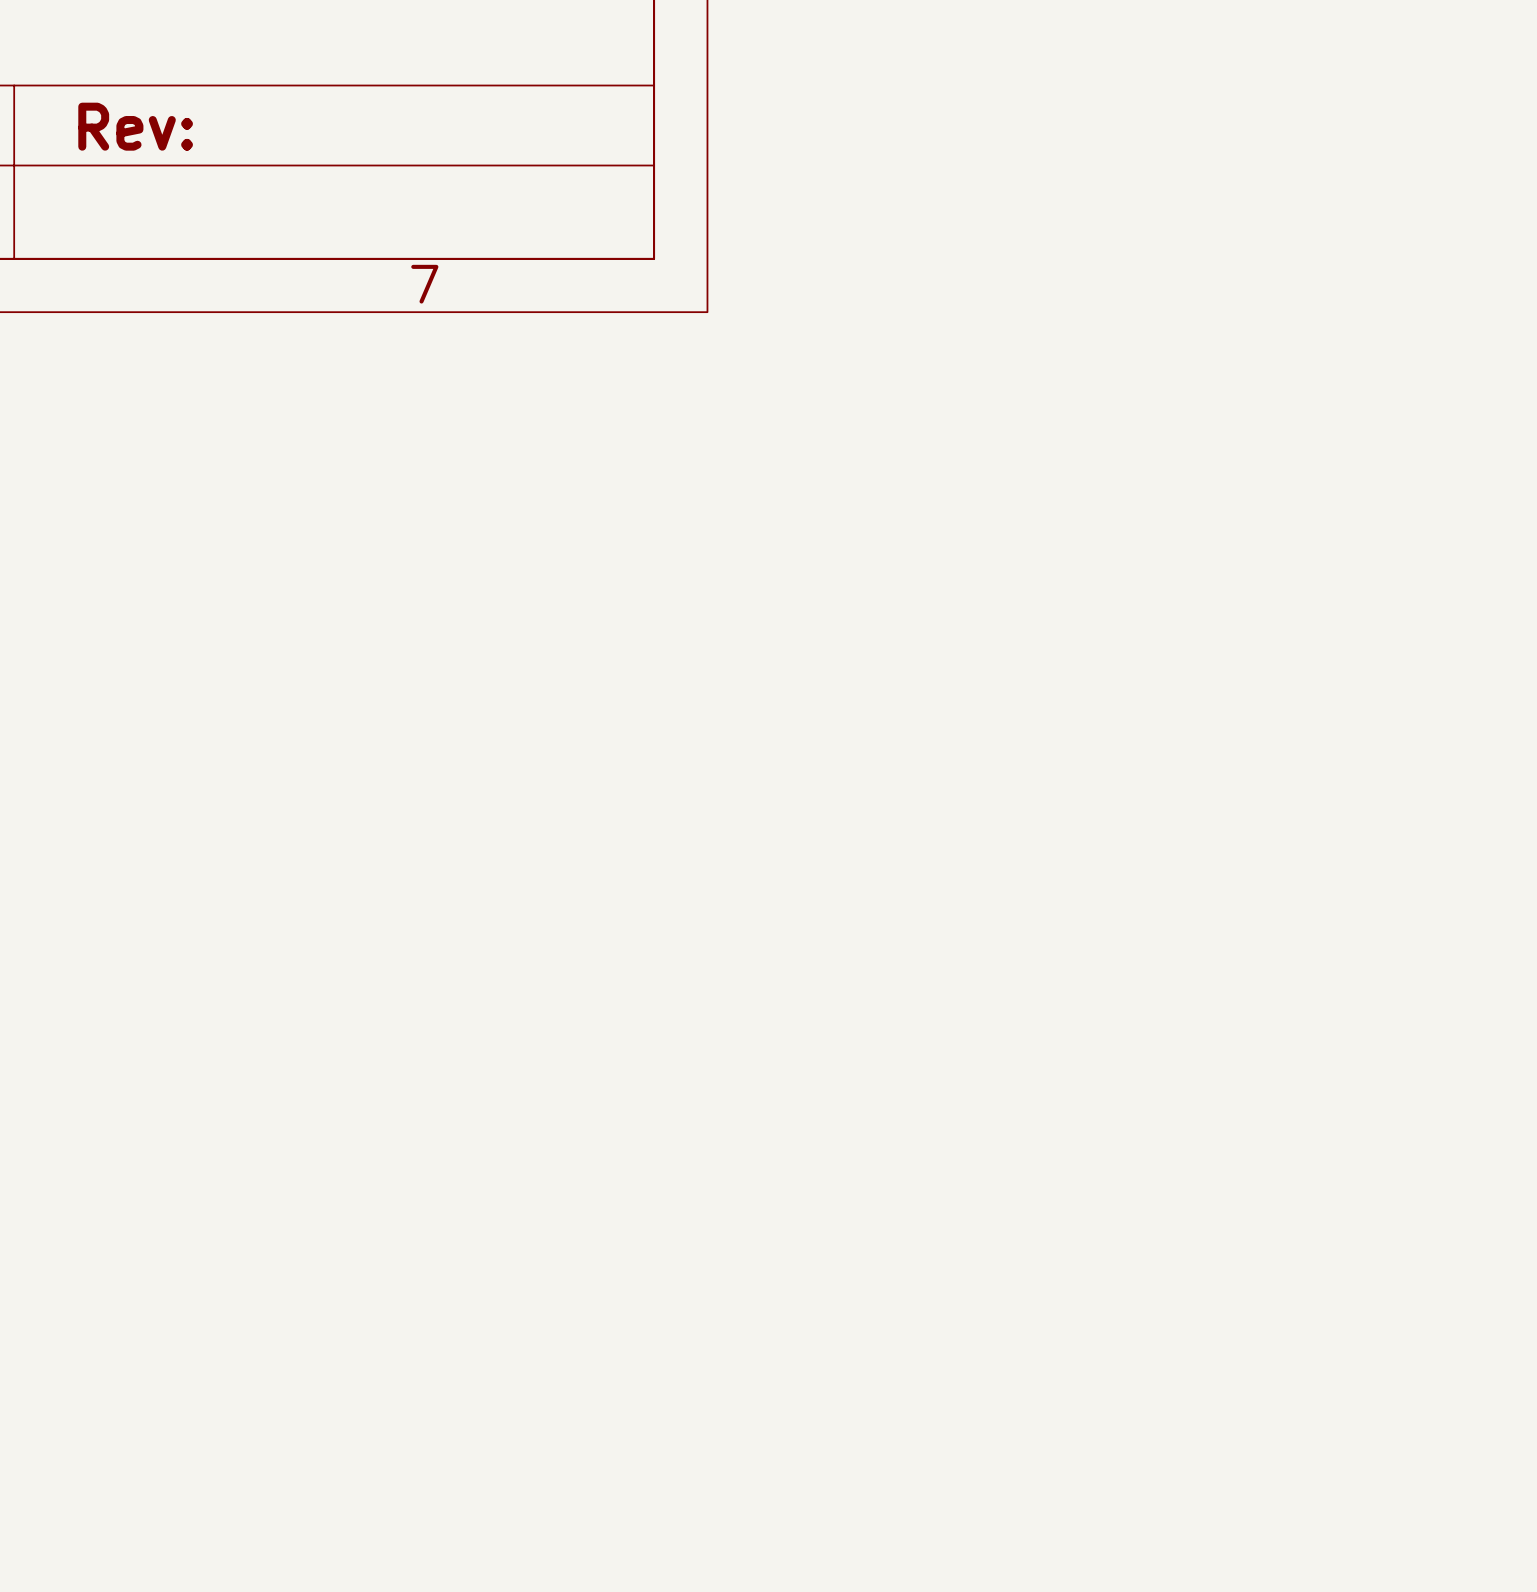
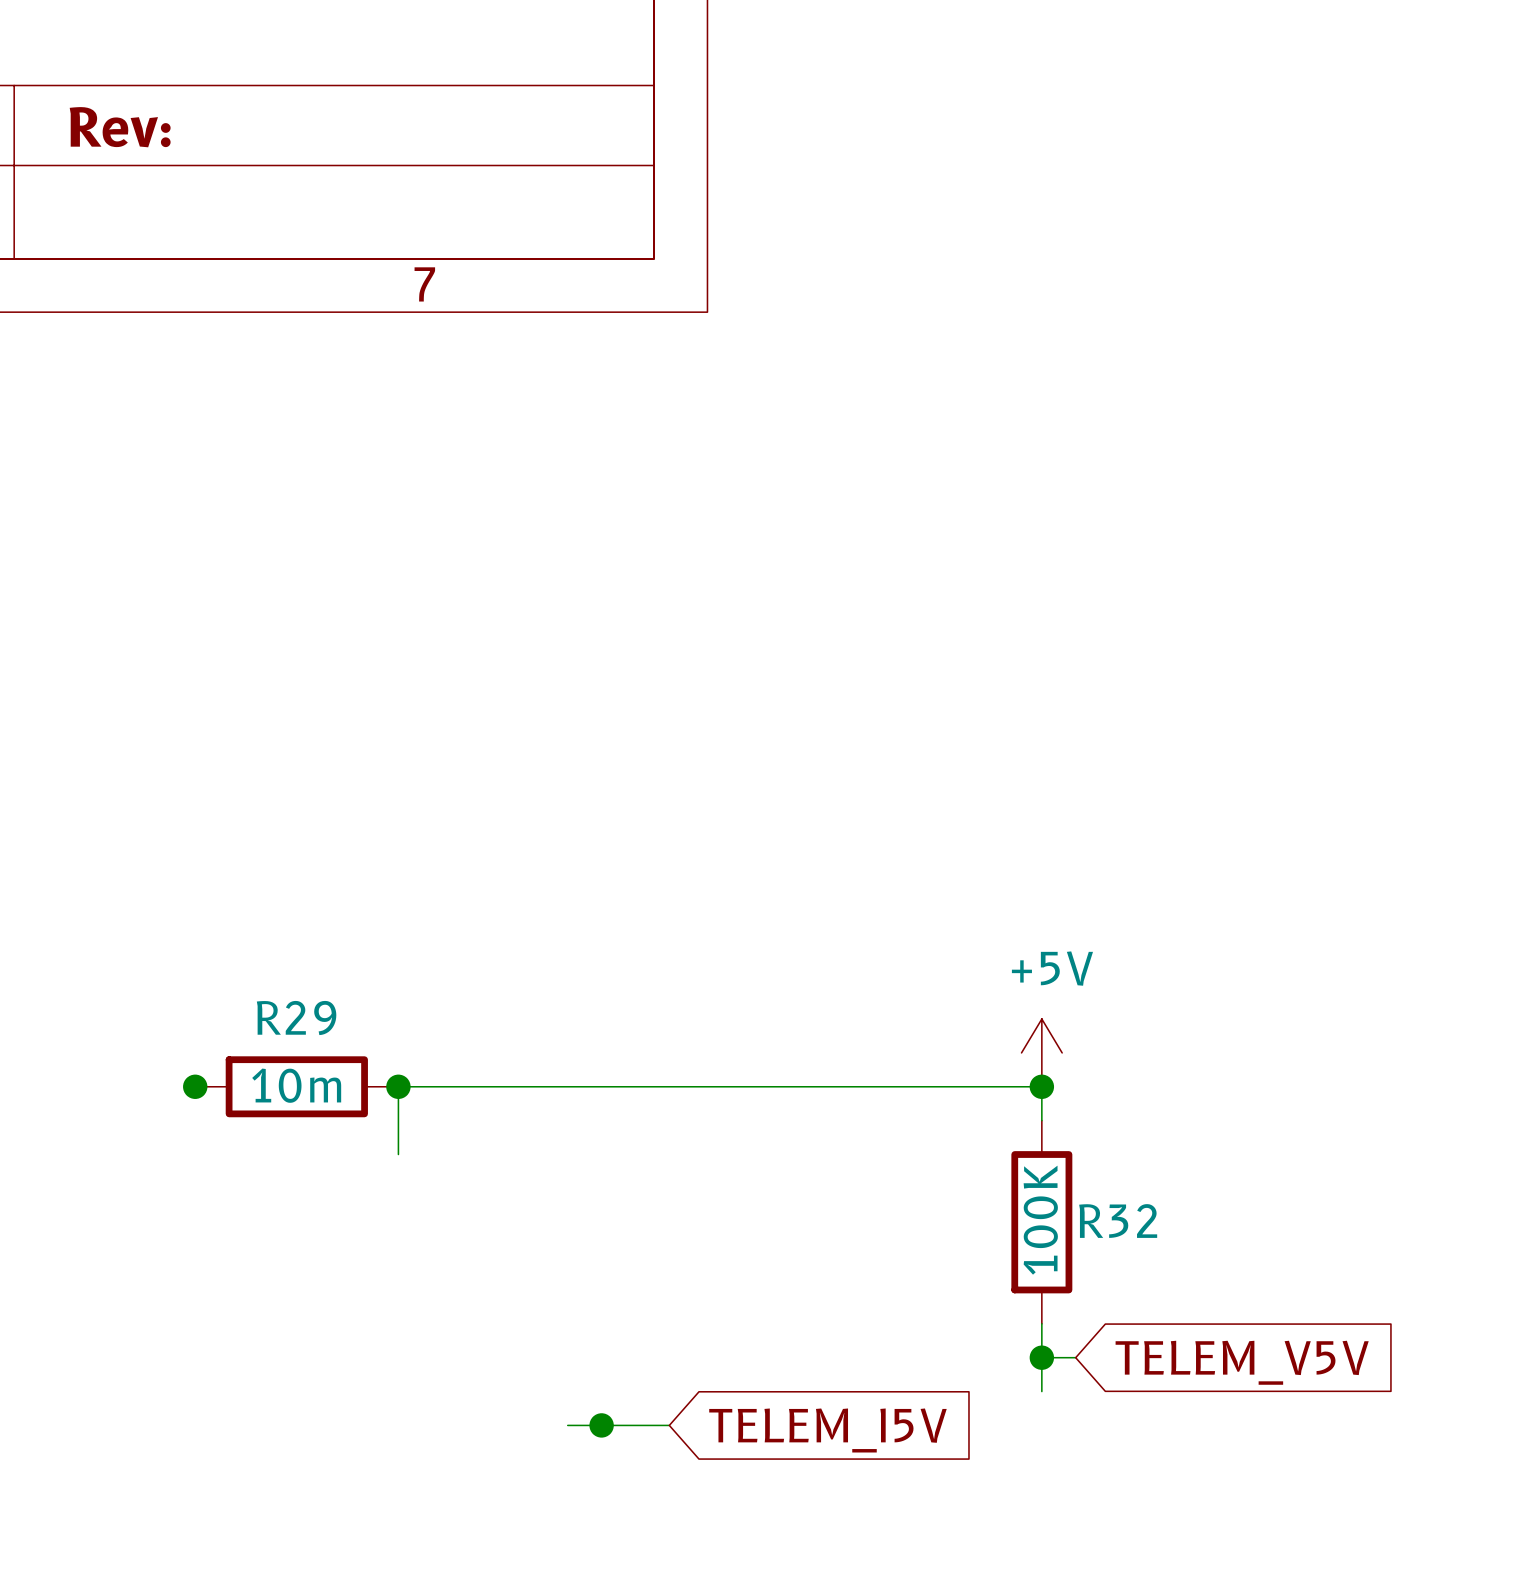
power symbol: none -> +5V (1041, 1052)
junction: none -> (195, 1086)
R29: none -> 10m (296, 1086)
junction: none -> (398, 1086)
junction: none -> (1041, 1086)
wire: none -> (1041, 1120) (1041, 1086) (398, 1086) (398, 1154)
R32: none -> 100K (1041, 1222)
wire: none -> (1041, 1323) (1041, 1391)
wire: none -> (1041, 1357) (1075, 1357)
junction: none -> (1041, 1357)
global label: none -> TELEM_V5V (1242, 1362)
wire: none -> (567, 1425) (669, 1425)
junction: none -> (601, 1425)
global label: none -> TELEM_I5V (827, 1430)

